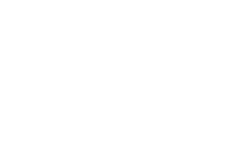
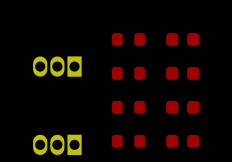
part: none -> (128, 39)
part: none -> (182, 39)
part: none -> (57, 66)
part: none -> (128, 73)
part: none -> (182, 73)
part: none -> (128, 107)
part: none -> (182, 107)
part: none -> (128, 141)
part: none -> (182, 141)
part: none -> (57, 144)

